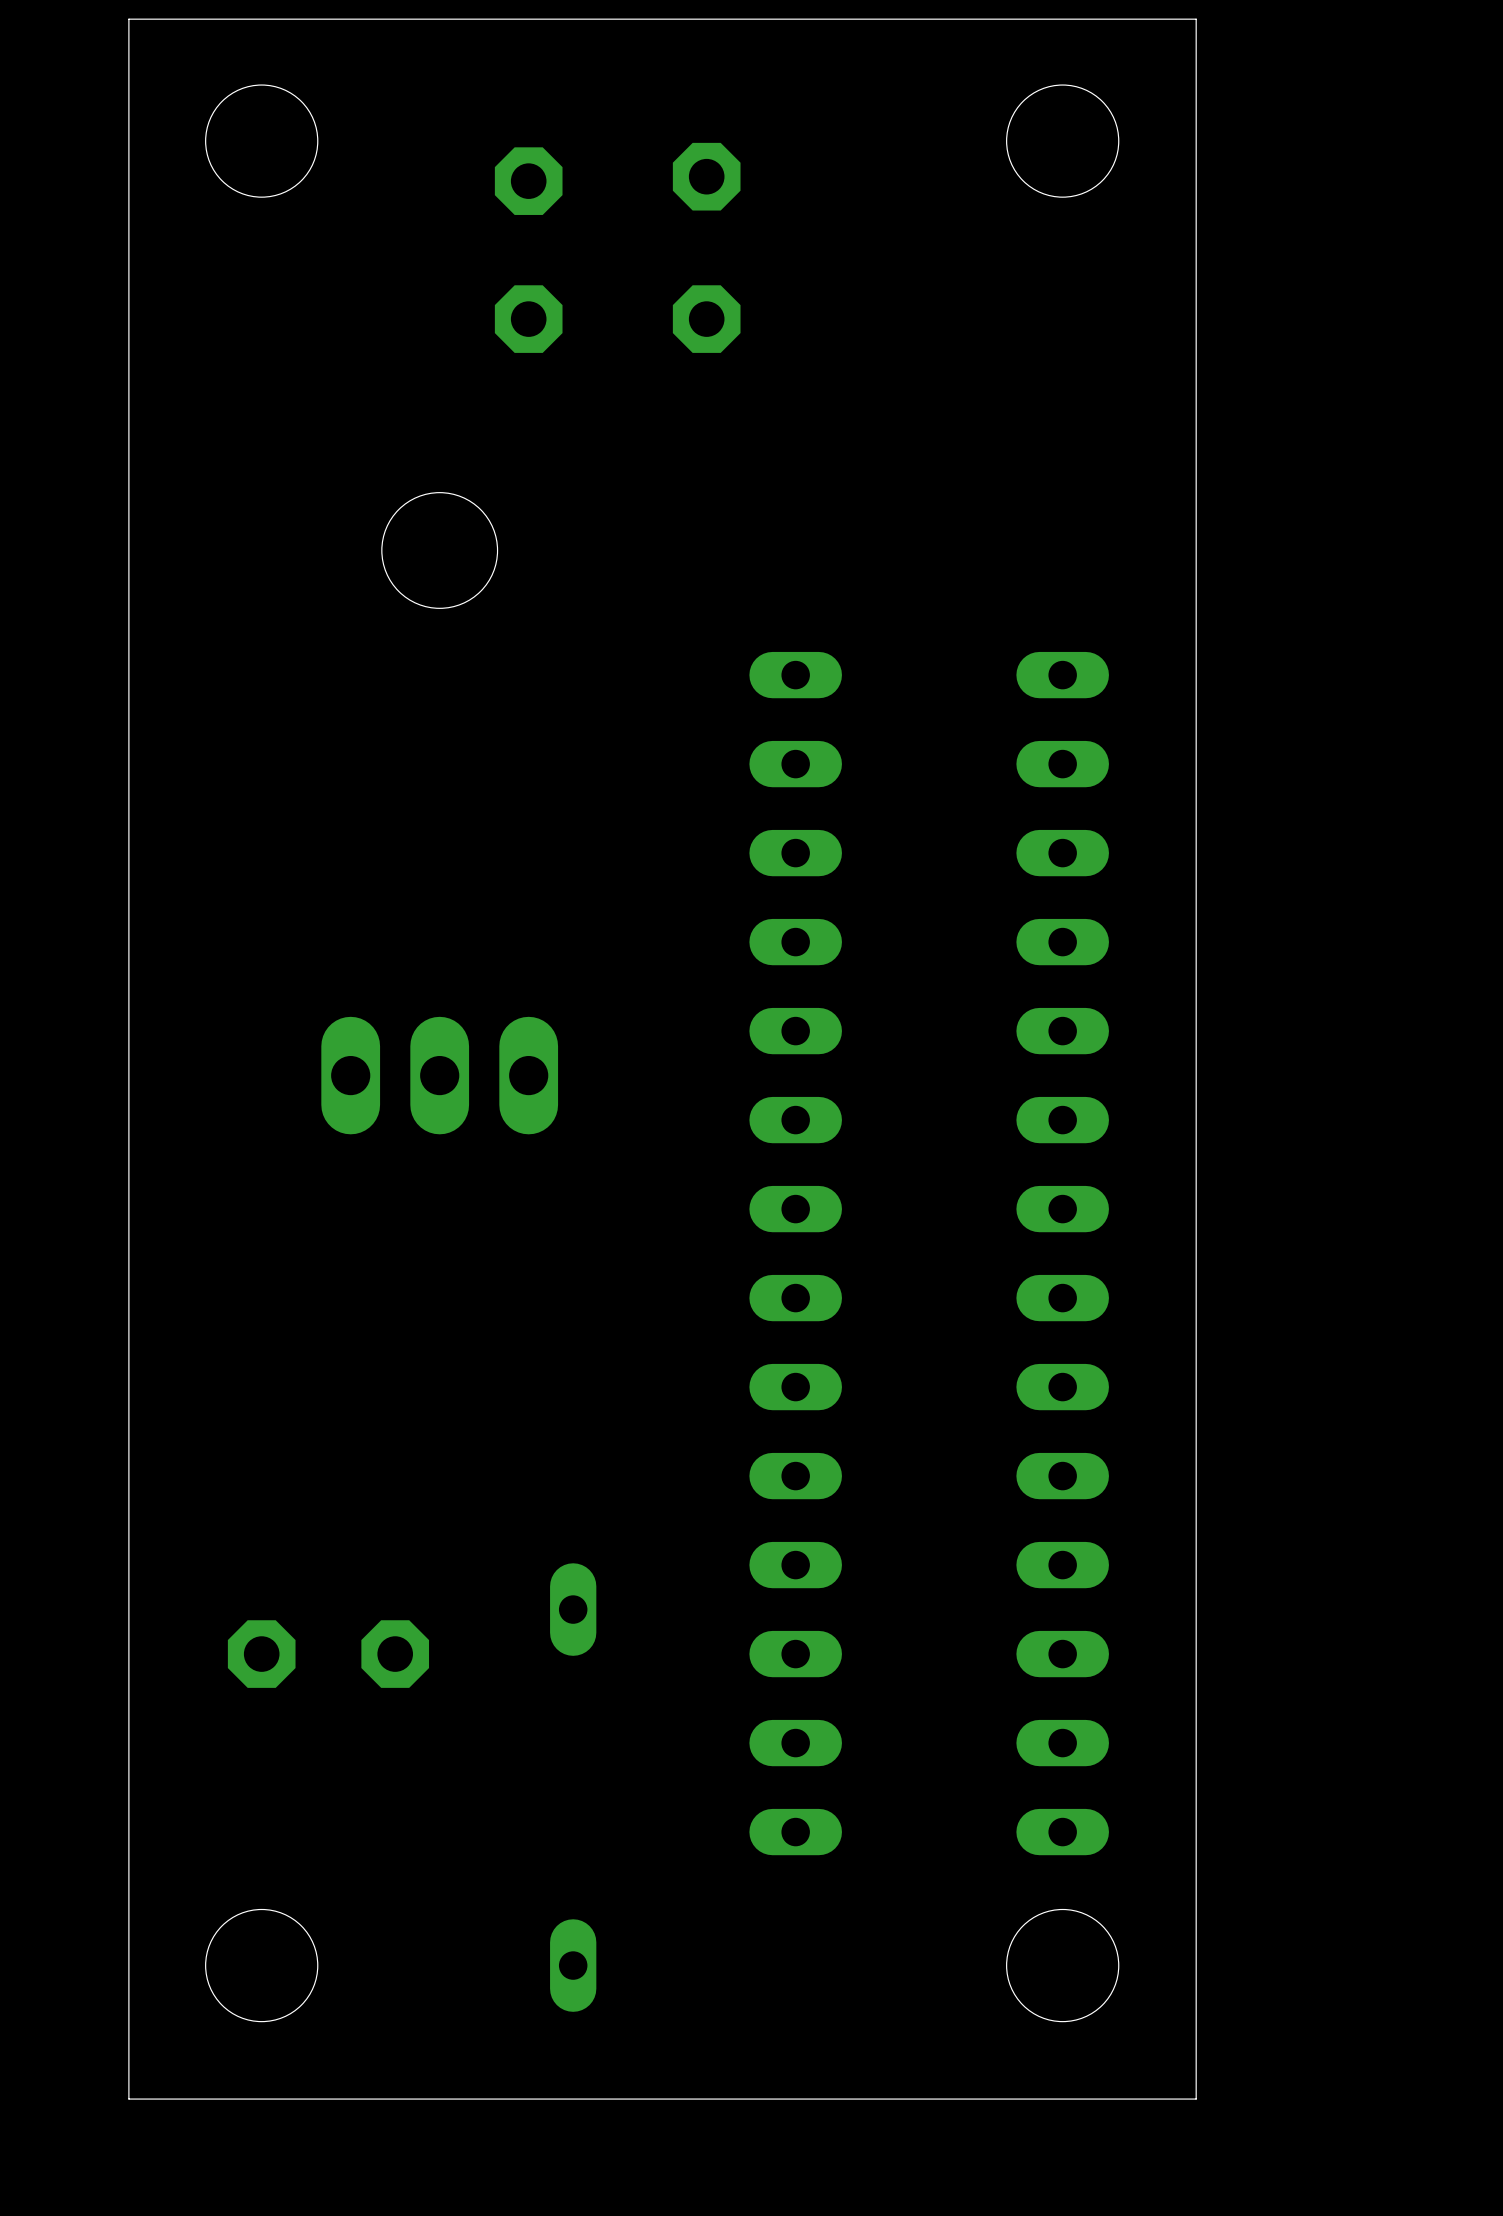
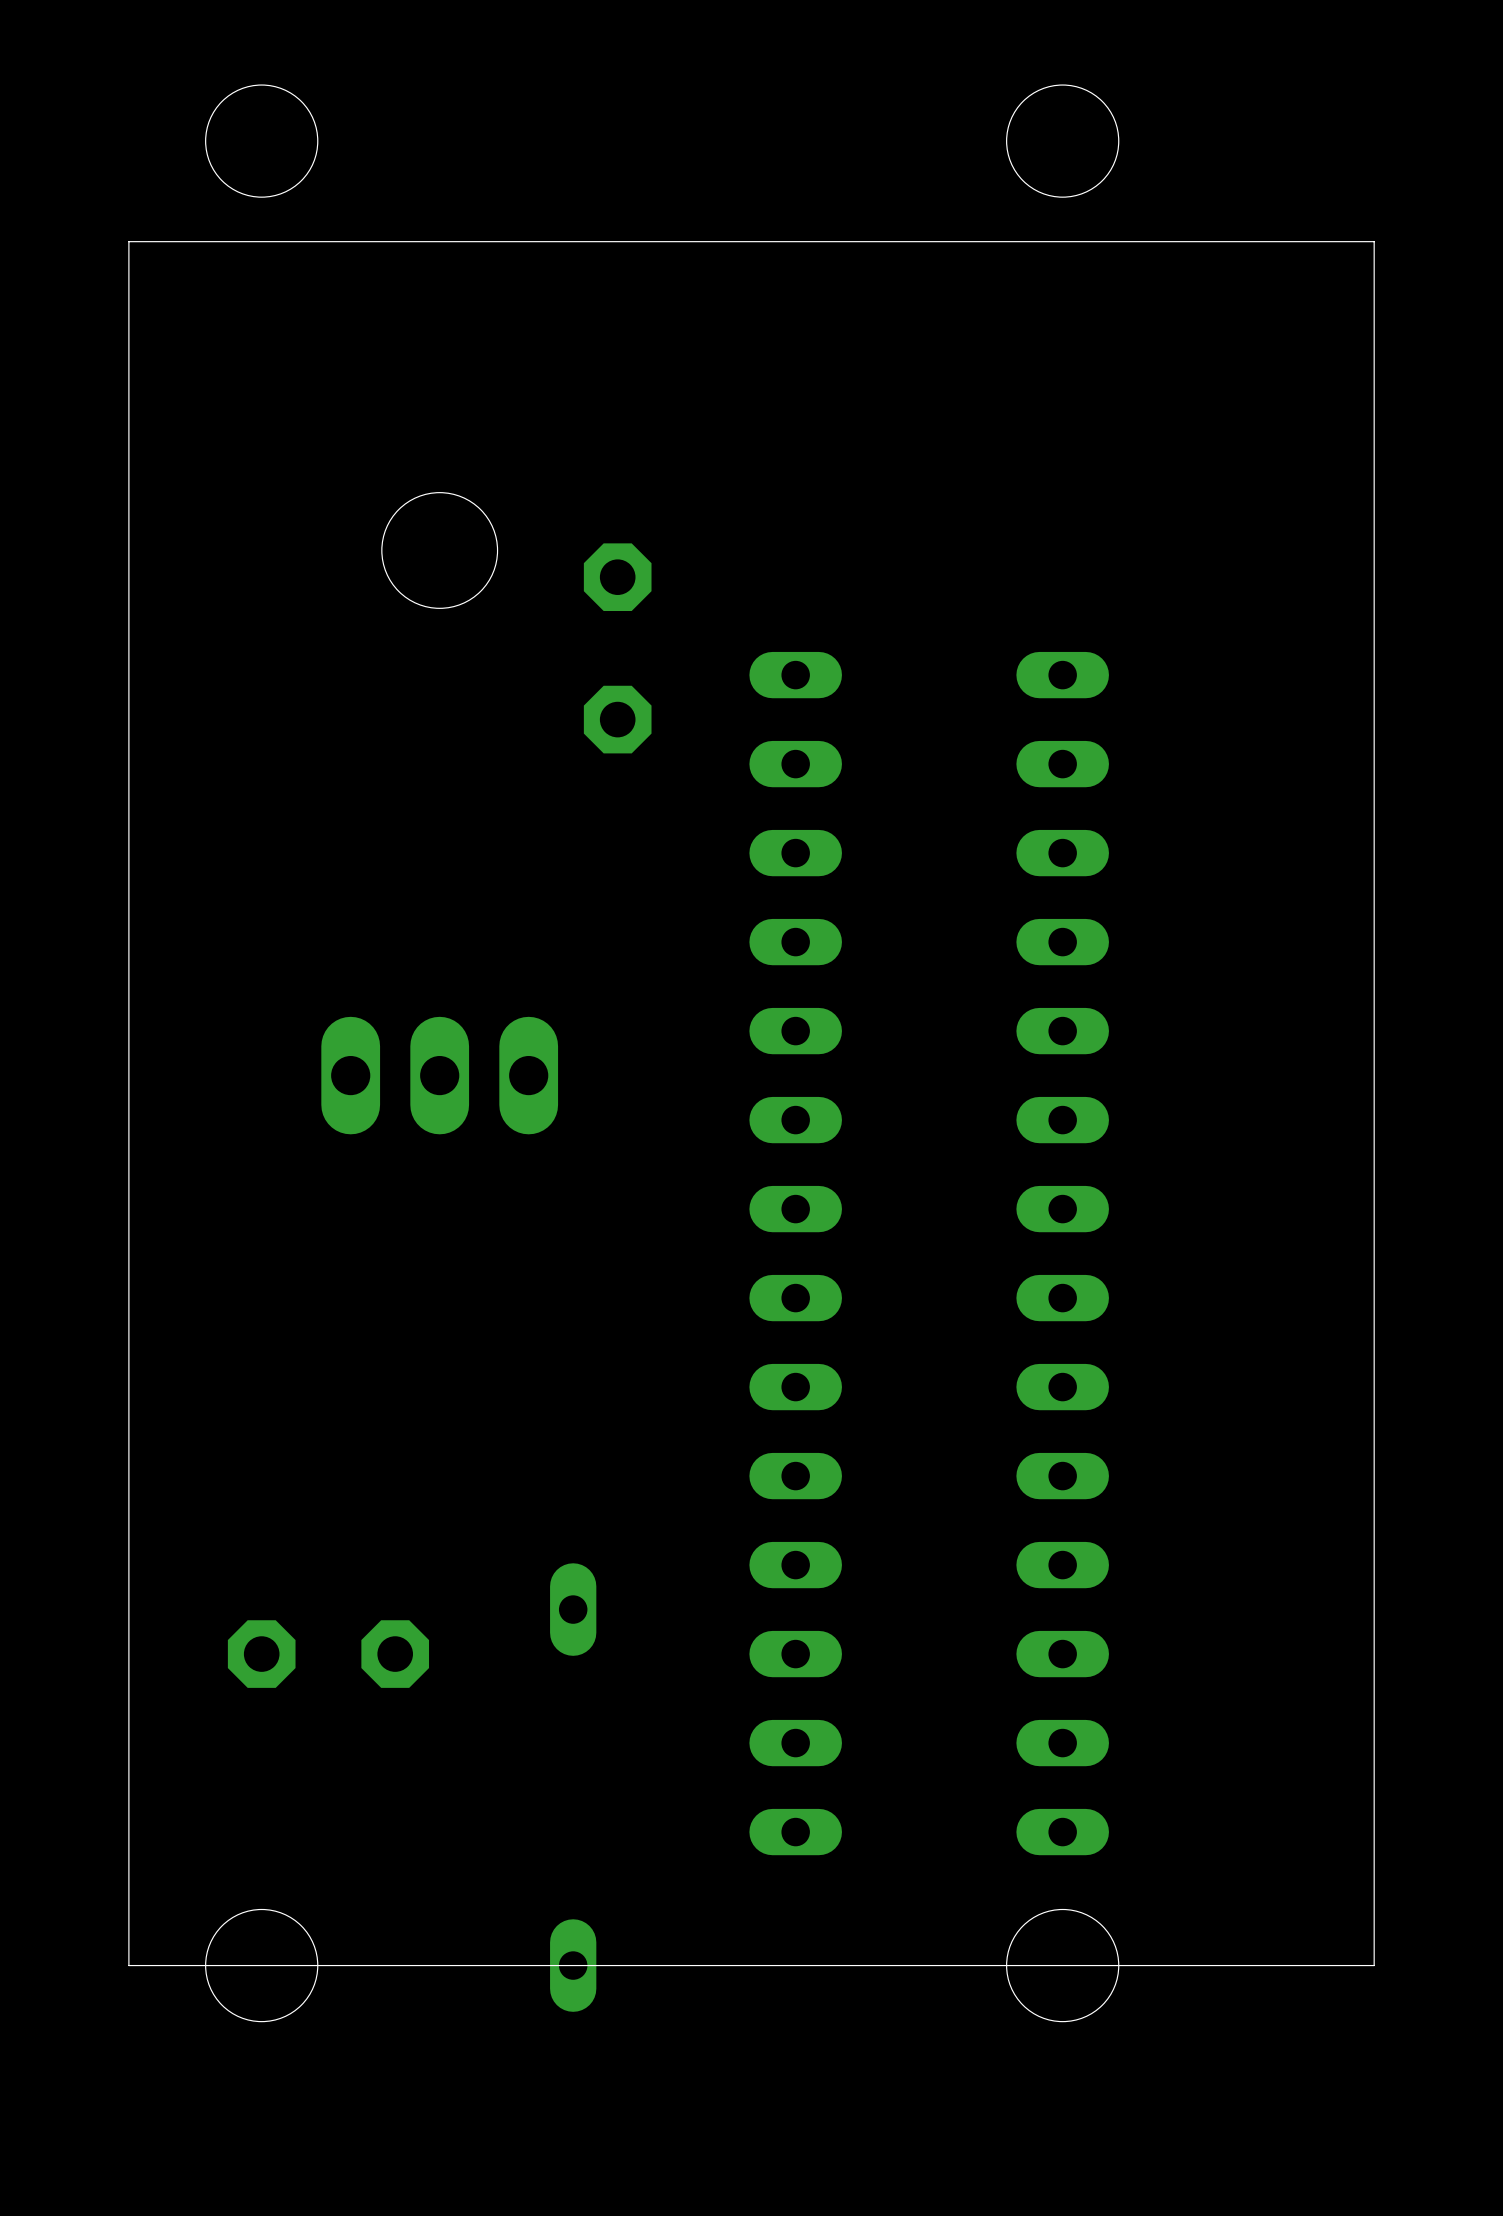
part: (706, 176) -> none
part: (528, 181) -> none
board edge: (128, 241) (128, 19) (1196, 19) (1196, 2099) (128, 2099) (128, 1965) -> (128, 241) (1374, 241) (1374, 1965) (128, 1965)
part: (528, 319) -> none
part: (706, 319) -> none
part: none -> (617, 577)
part: none -> (617, 719)

